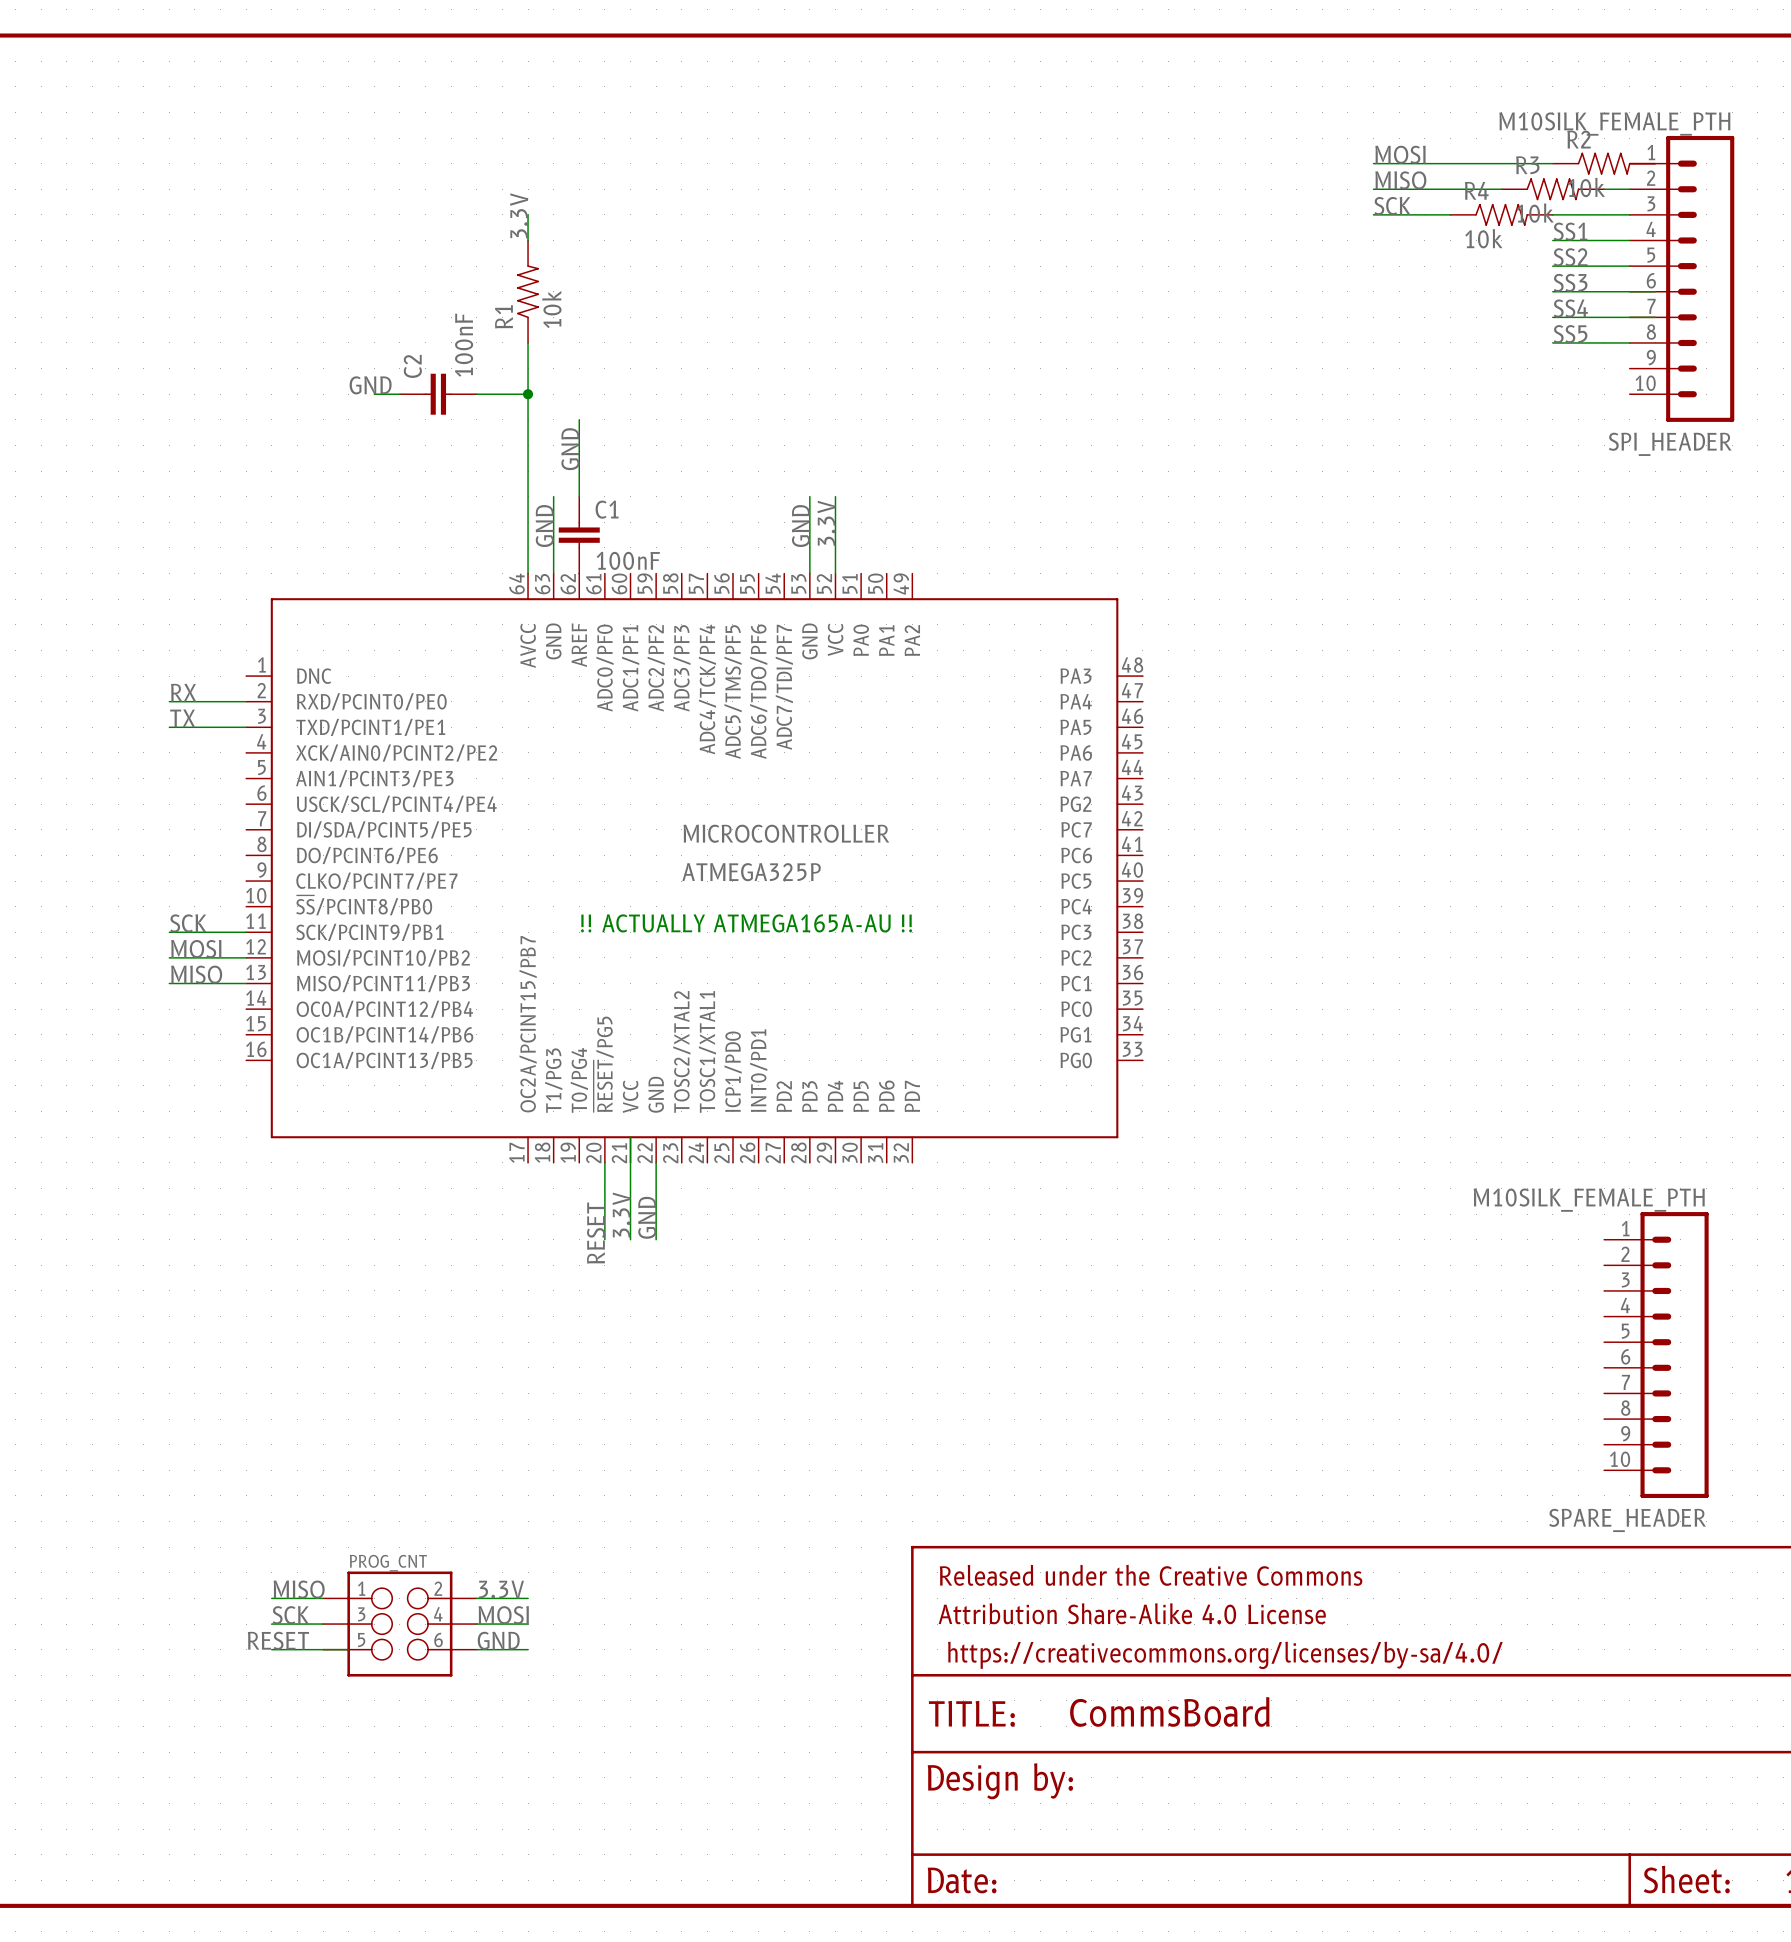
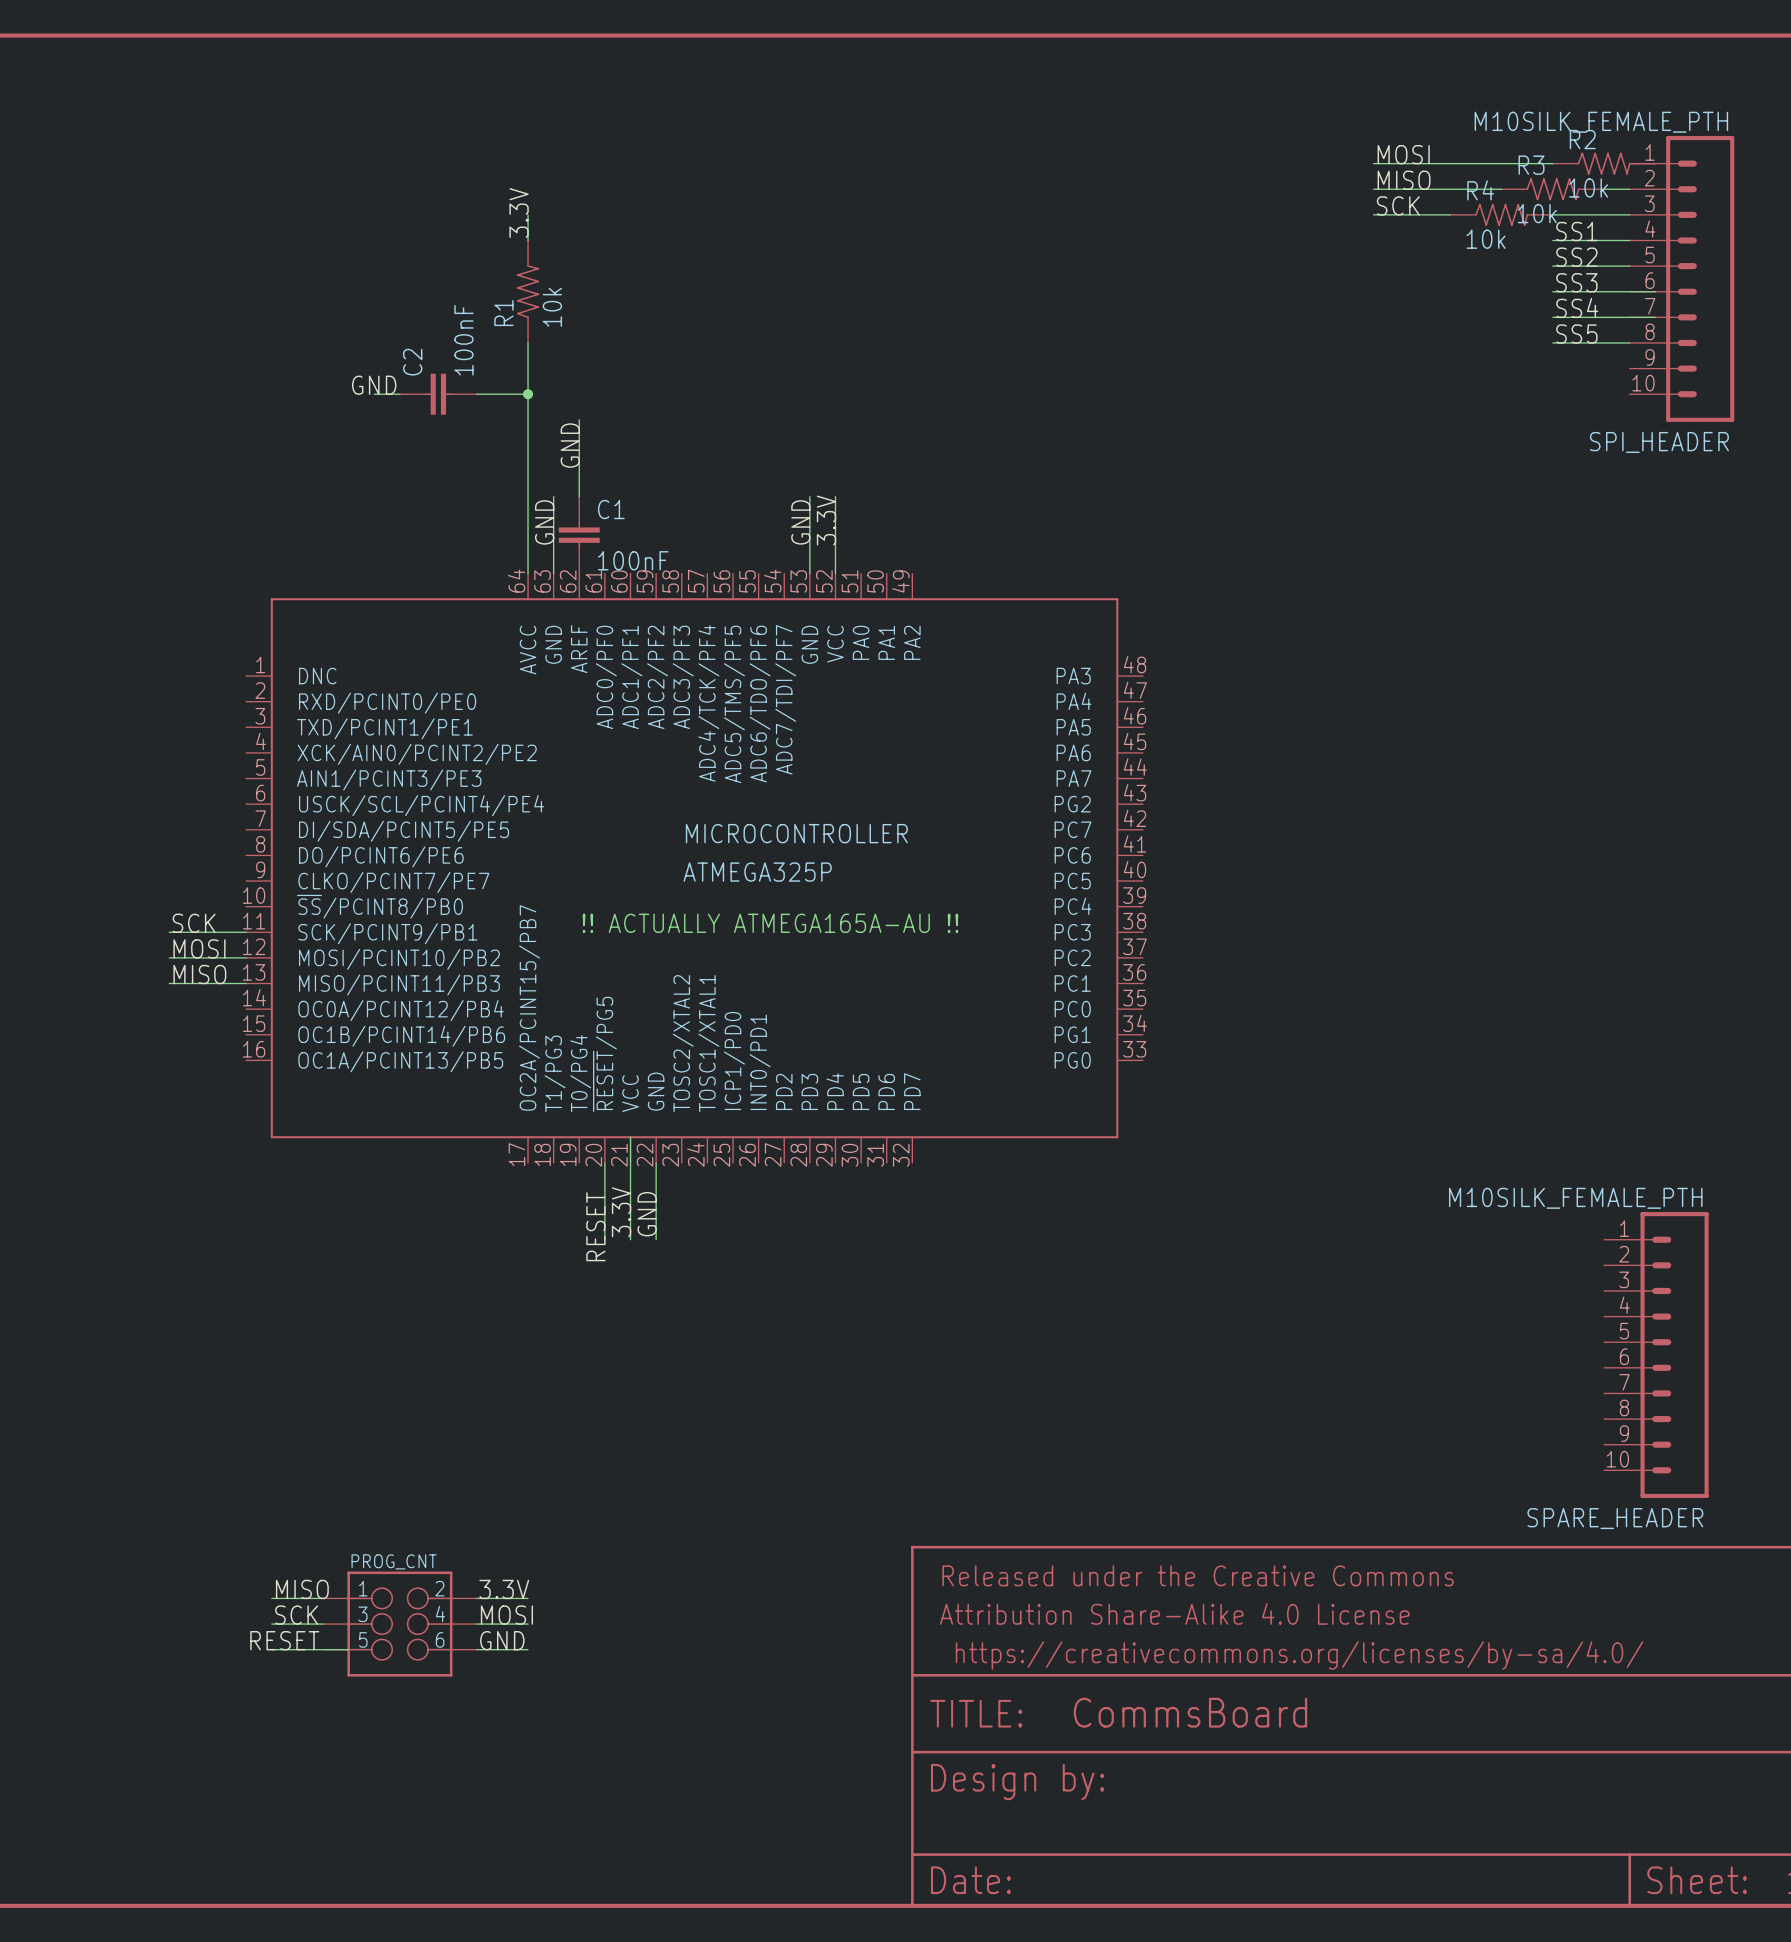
label: RX (183, 692) -> none
wire: (169, 701) (246, 701) -> none
label: TX (182, 718) -> none
wire: (169, 727) (246, 727) -> none

